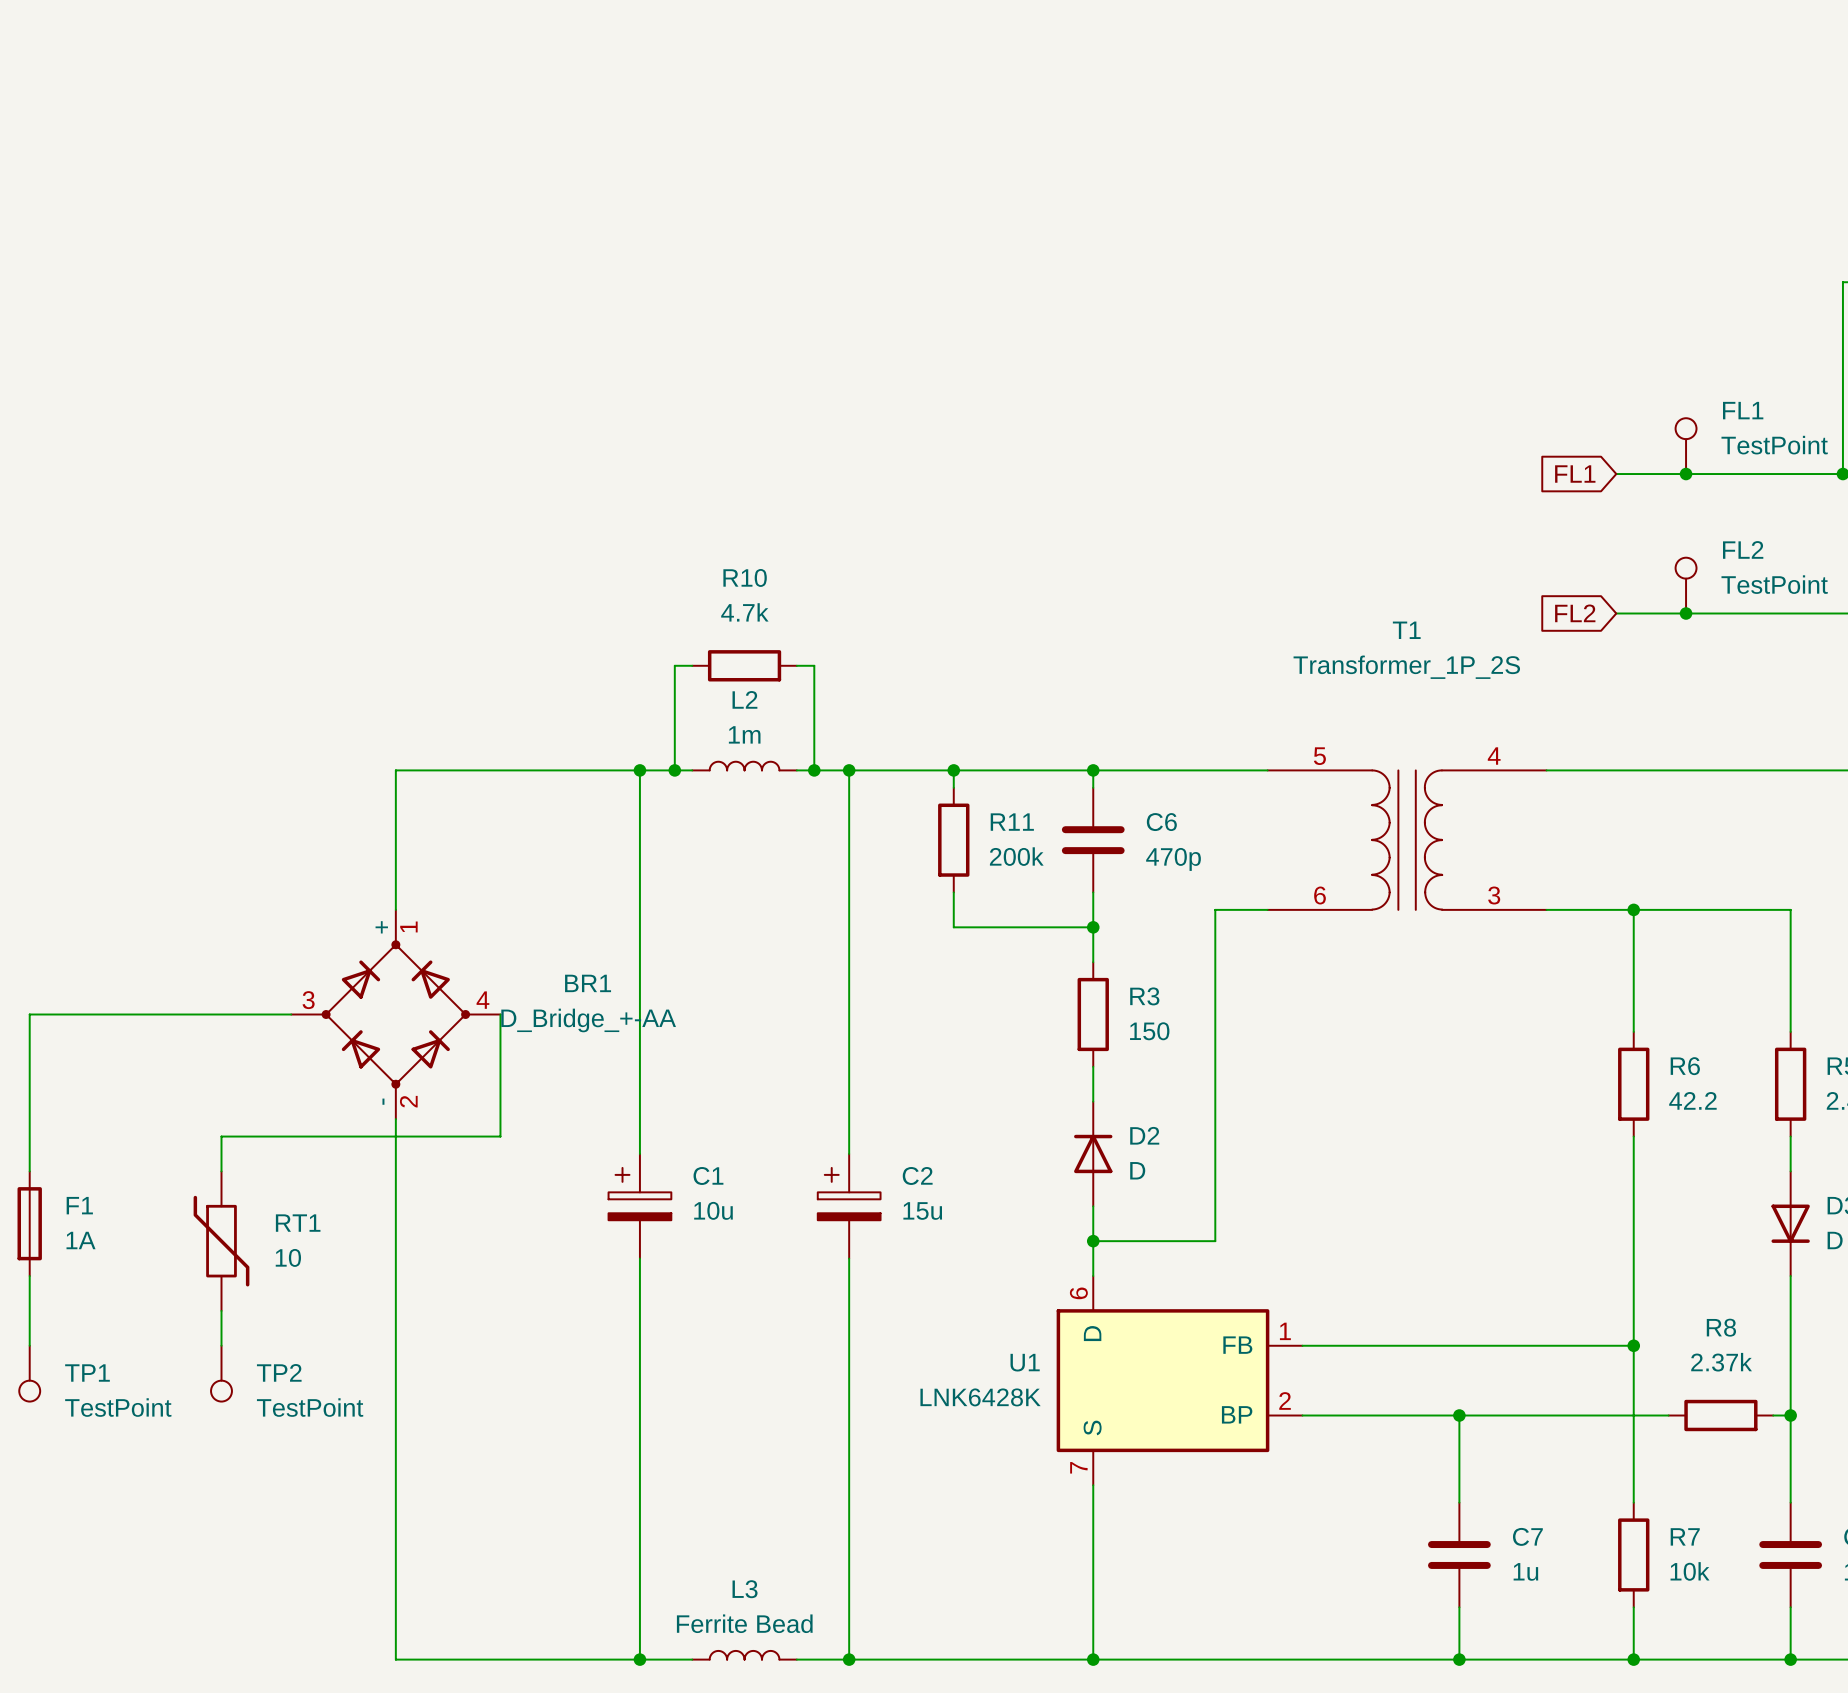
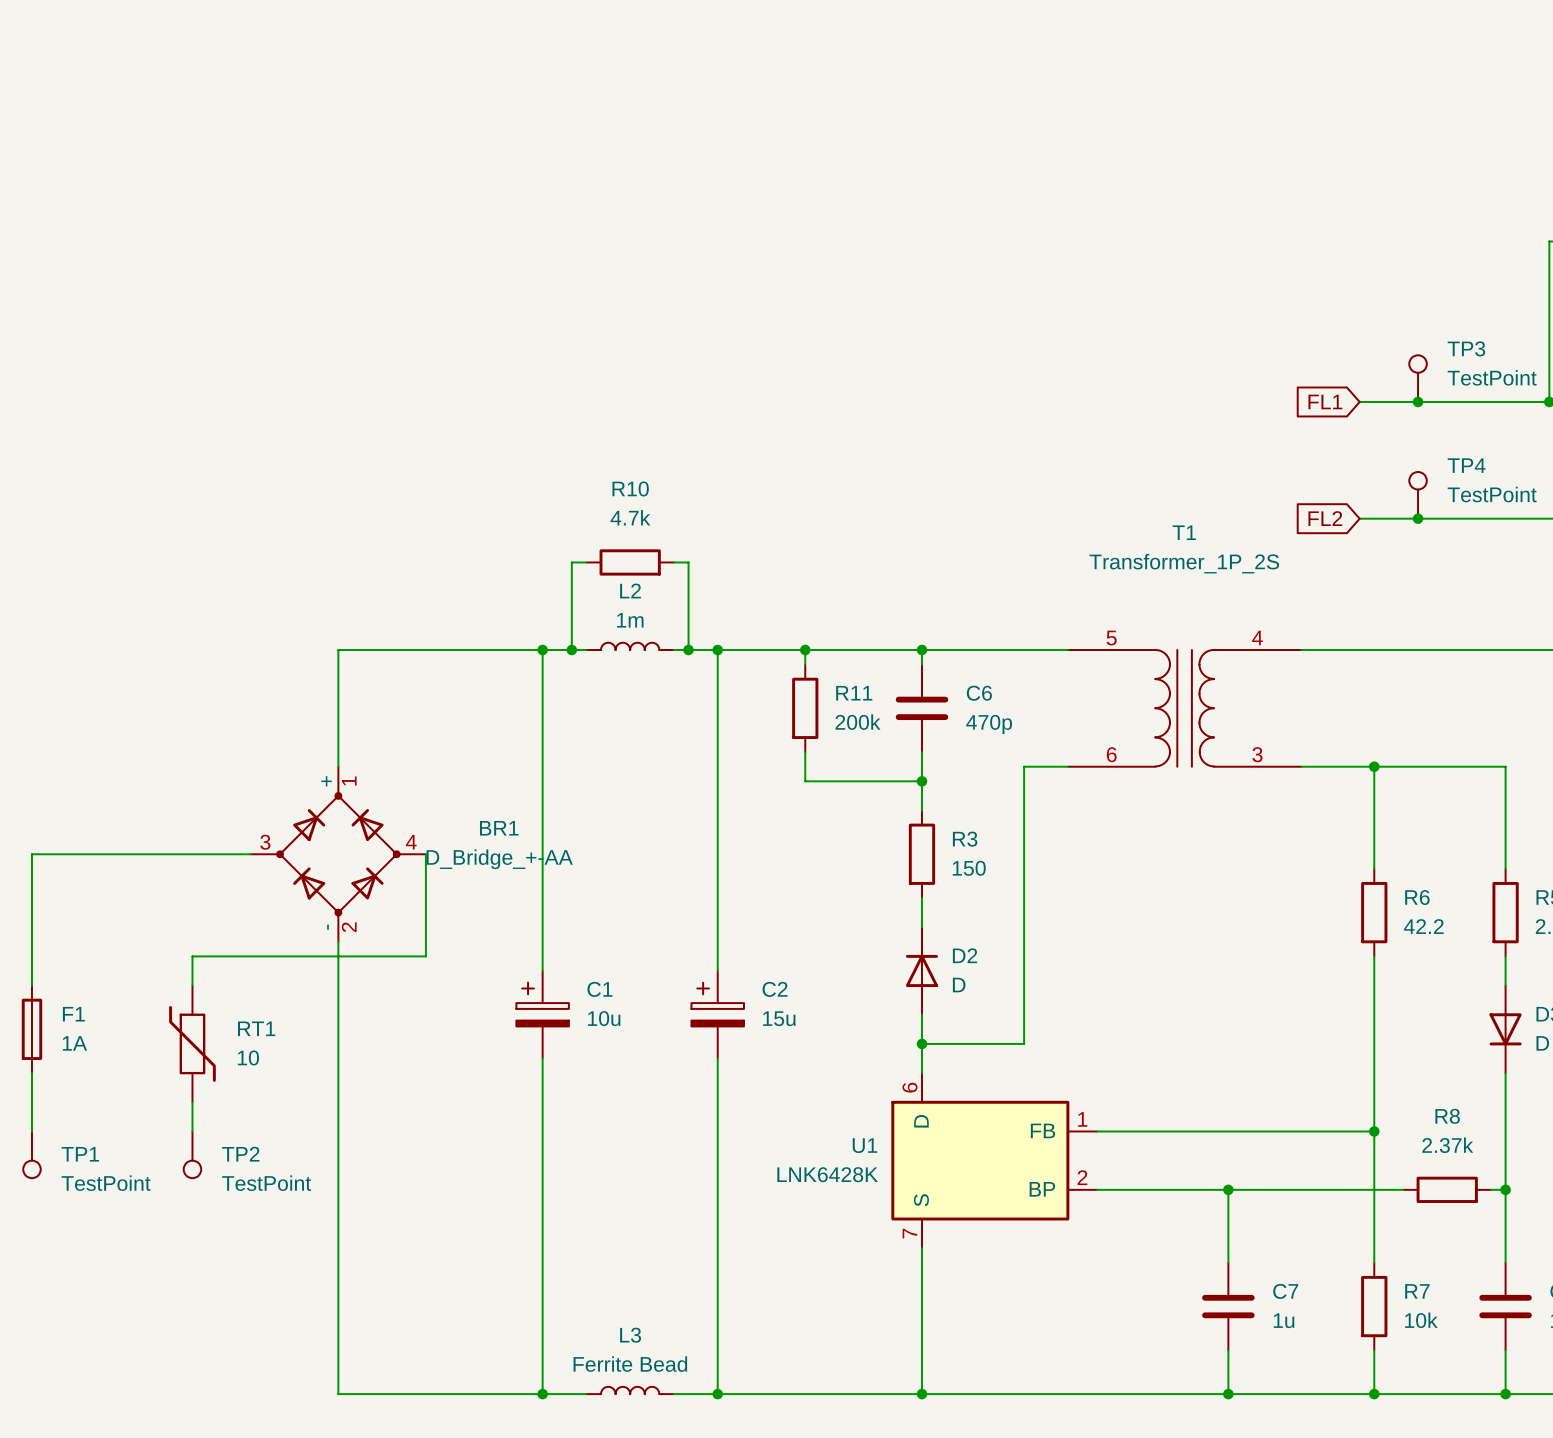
FL1 name: FL1 (1743, 410) -> TP3 (1466, 348)
FL2 name: FL2 (1743, 549) -> TP4 (1466, 465)

